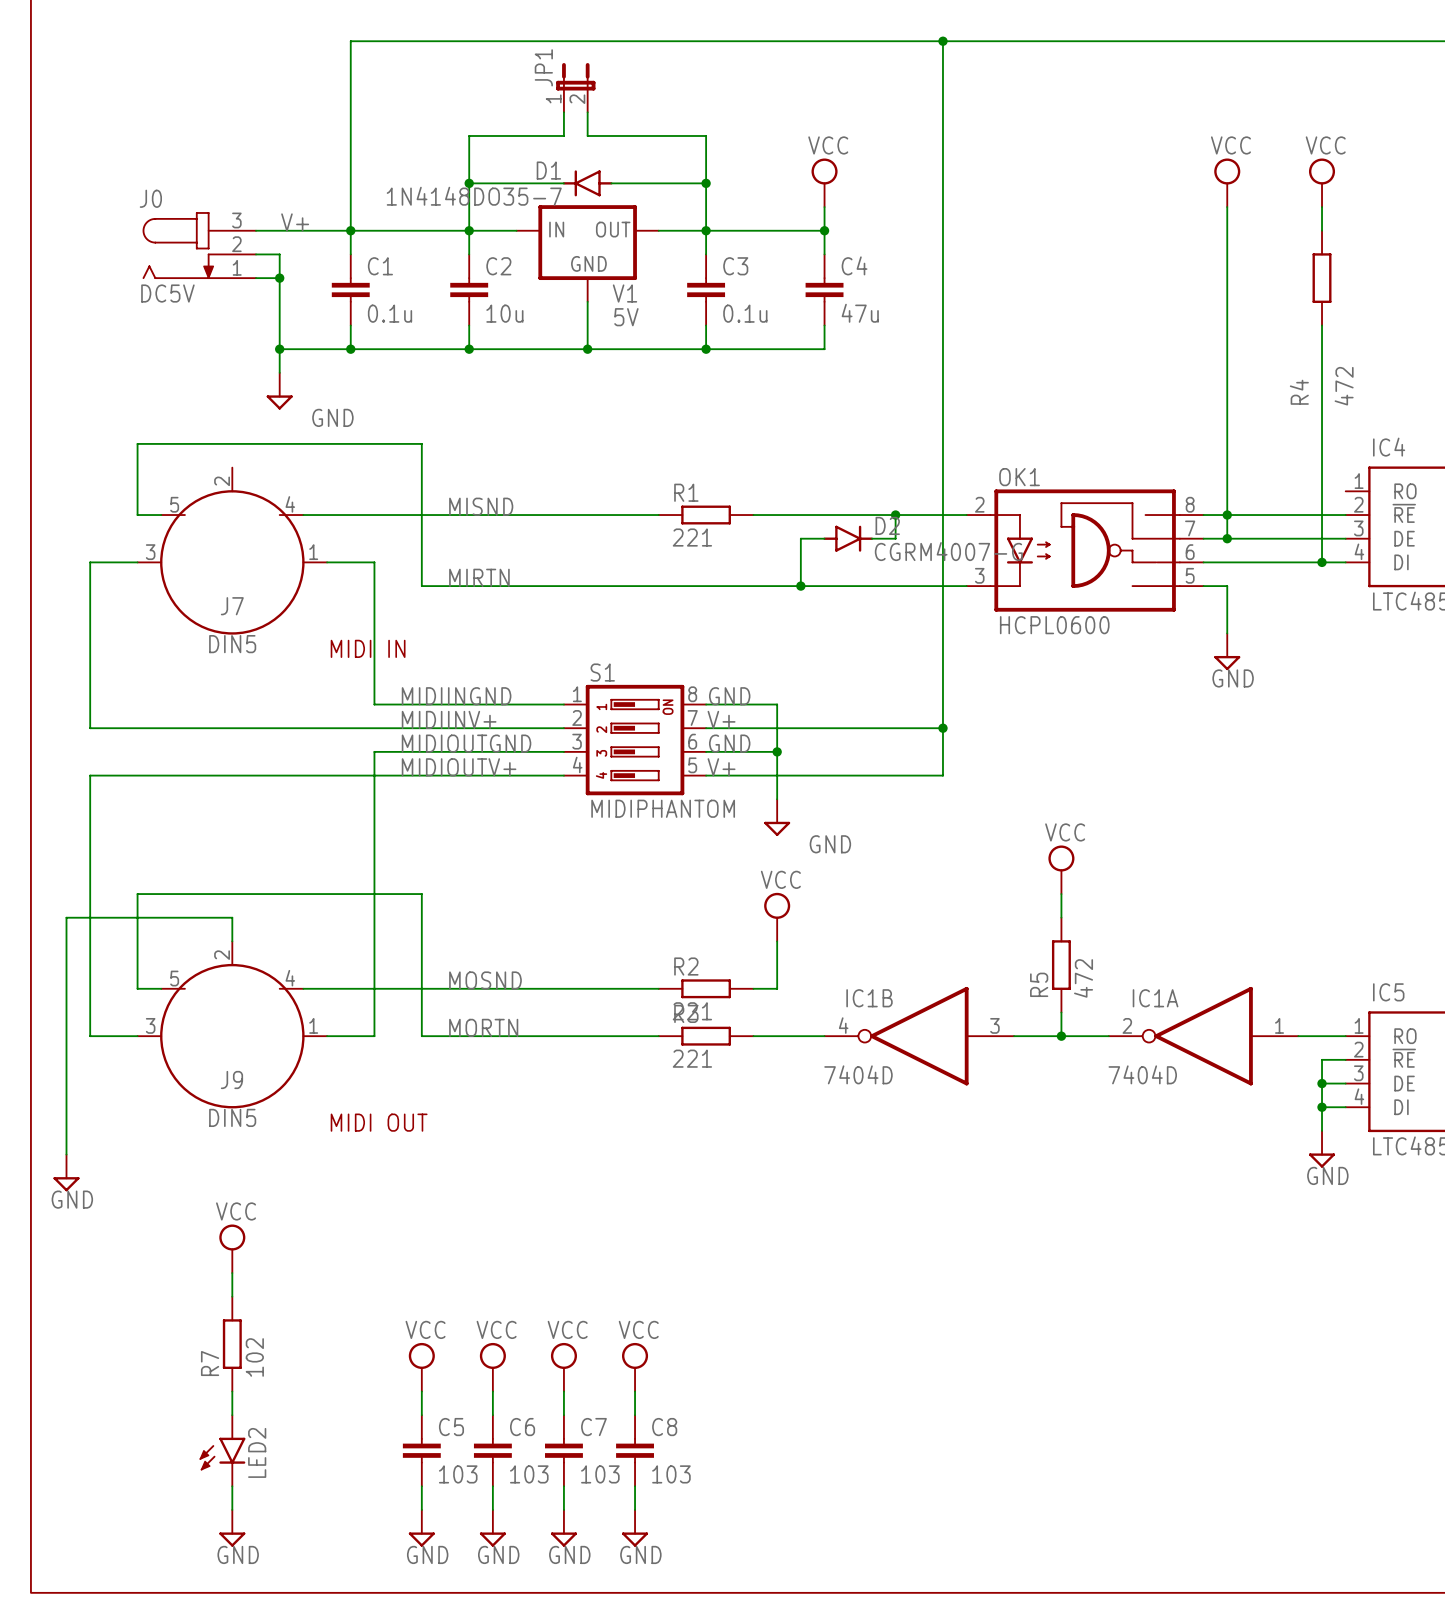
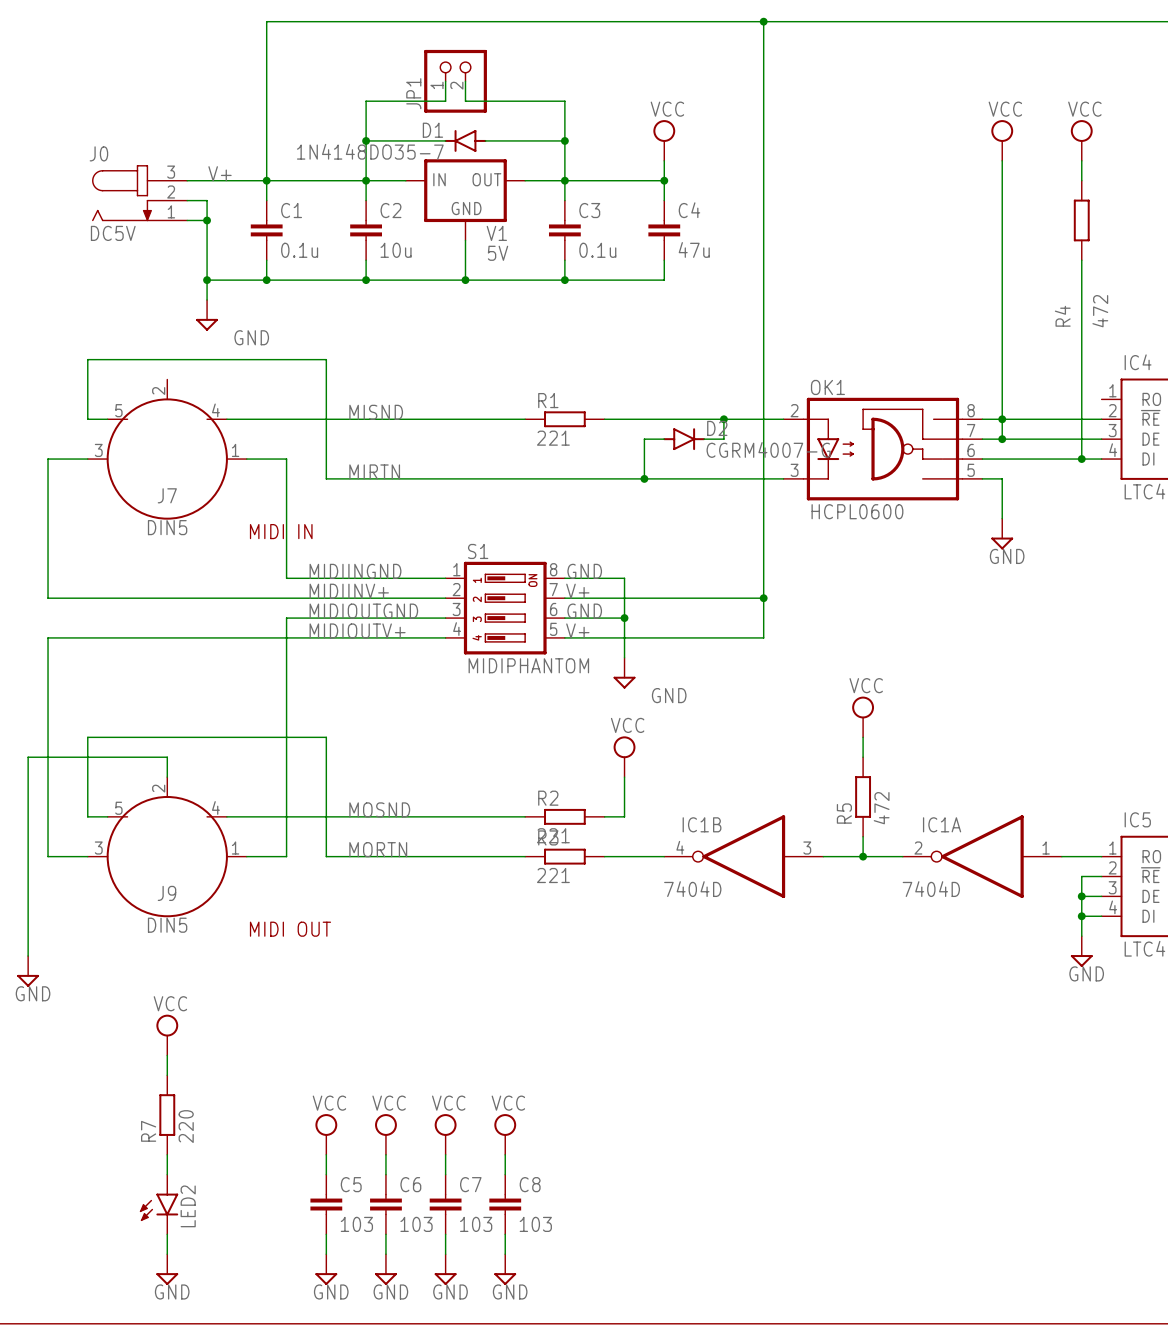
JP1 symbol: [556, 63, 596, 113] -> [424, 49, 487, 113]
JP1 name position: JP1 (543, 67) -> JP1 (413, 93)
R7 value: 102 (254, 1357) -> 220 (186, 1126)

